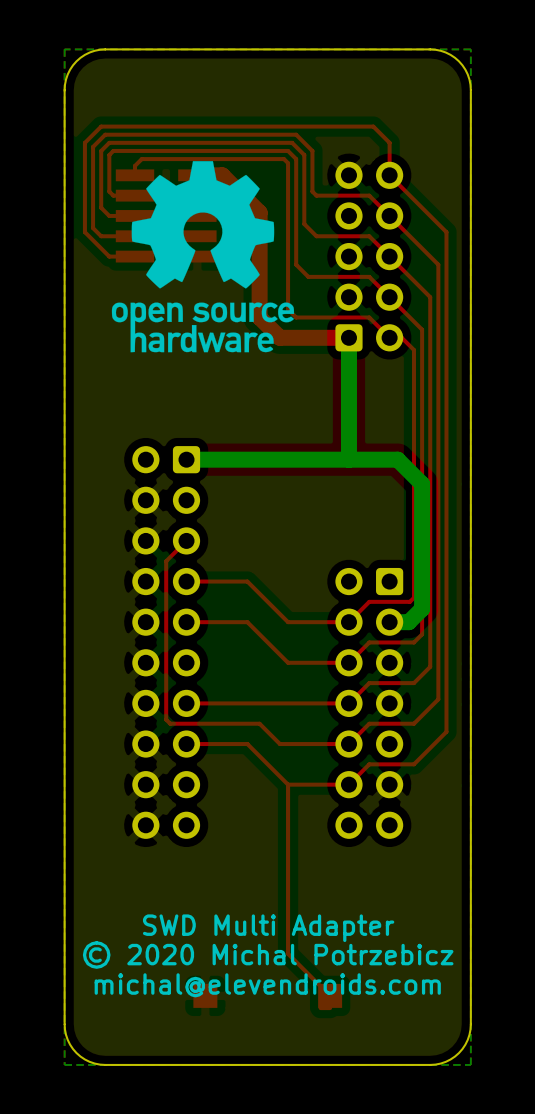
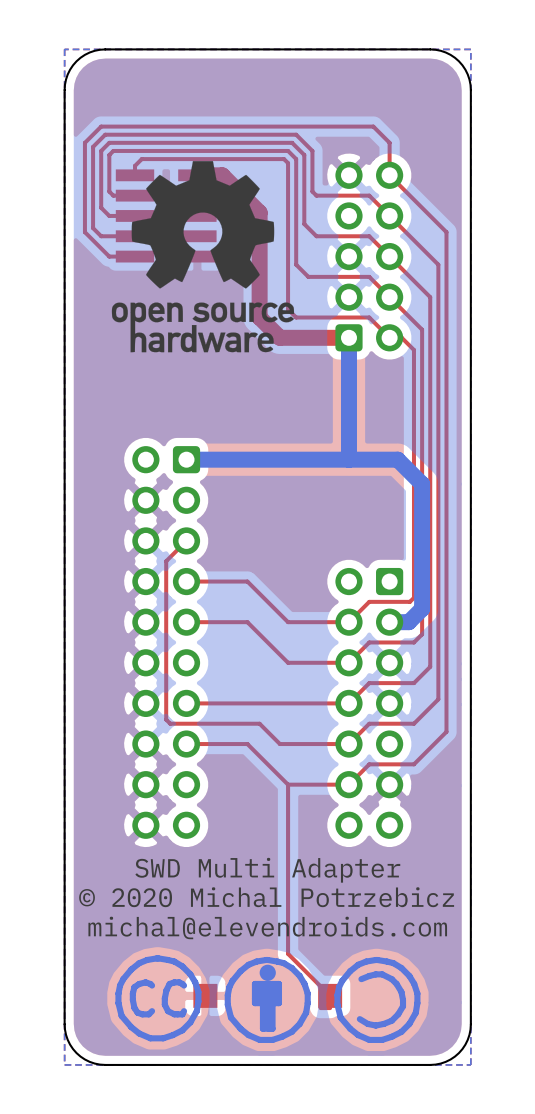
text: none -> SWD Multi Adapter (267, 870)
text: SWD Multi Adapter (268, 928) -> michal@elevendroids.com (267, 927)
drawing: none -> [115, 955, 202, 1042]
text position: © 2020 Michal Potrzebicz (268, 955) -> © 2020 Michal Potrzebicz (266, 897)
drawing: none -> [224, 956, 311, 1043]
drawing: none -> [334, 956, 421, 1043]
text: michal@elevendroids.com (267, 985) -> none

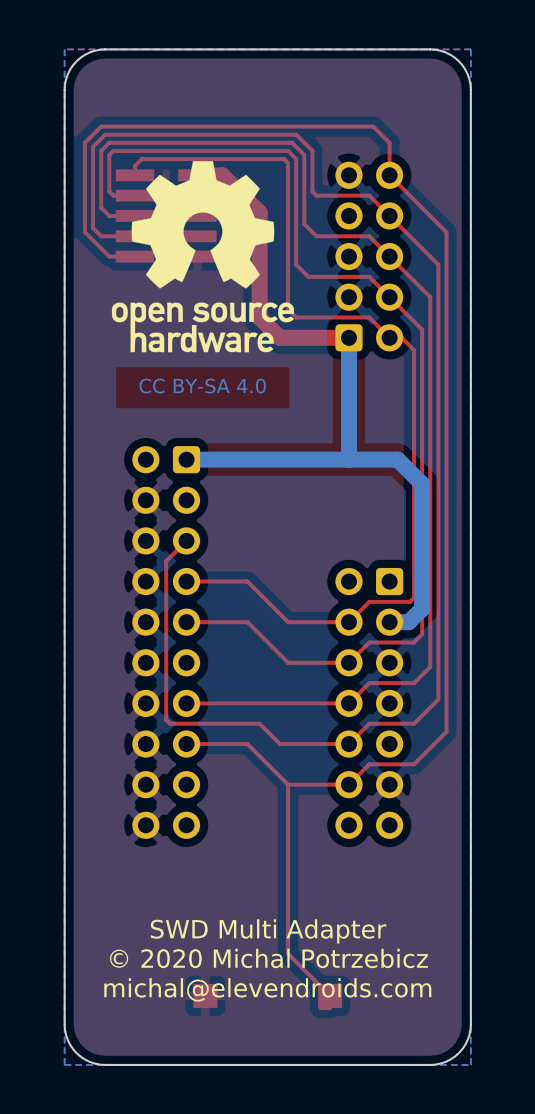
text: none -> CC BY-SA 4.0 (202, 386)
text: SWD Multi Adapter (267, 870) -> none
text position: © 2020 Michal Potrzebicz (266, 897) -> © 2020 Michal Potrzebicz (268, 958)
text: michal@elevendroids.com (267, 927) -> SWD Multi Adapter (268, 931)
drawing: [115, 955, 202, 1042] -> none
drawing: [224, 956, 311, 1043] -> none
drawing: [334, 956, 421, 1043] -> none
text: none -> michal@elevendroids.com (267, 989)

